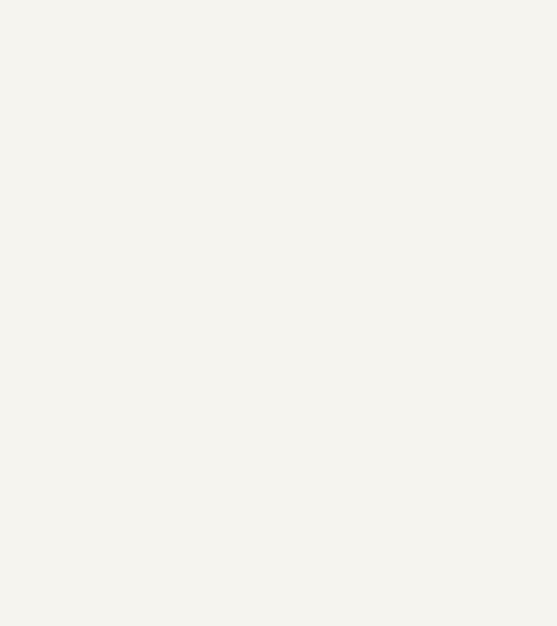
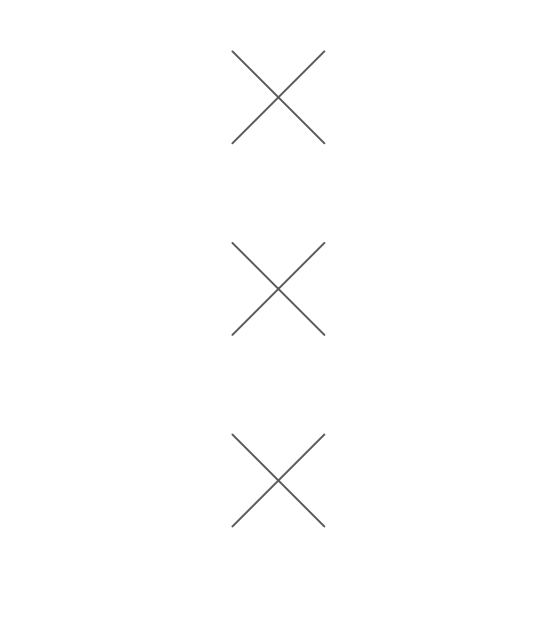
no-connect mark: none -> (278, 97)
no-connect mark: none -> (278, 288)
no-connect mark: none -> (278, 480)

